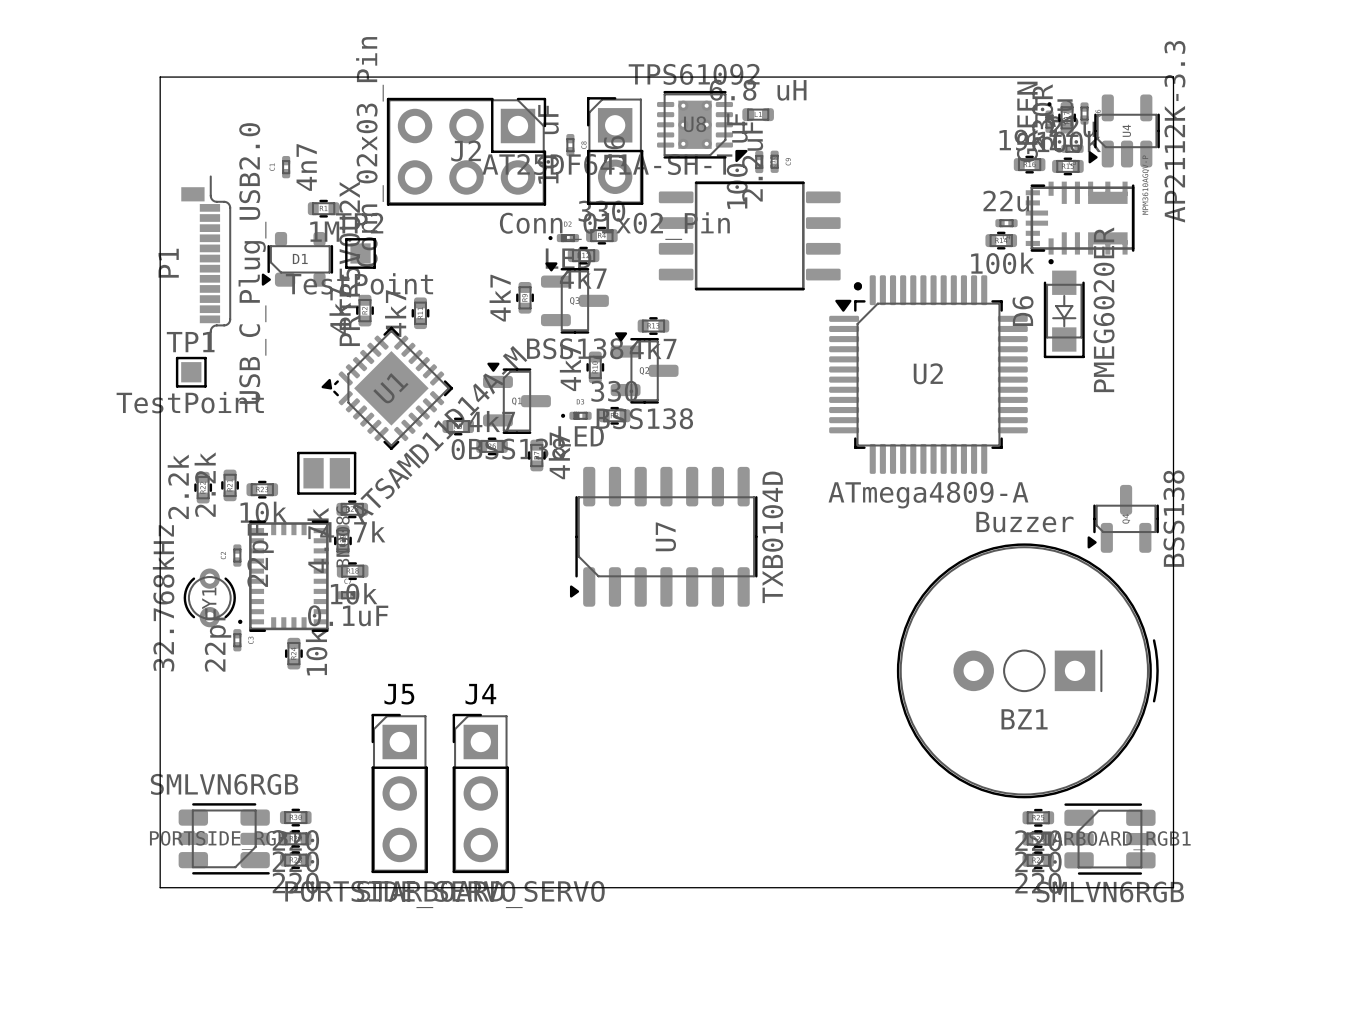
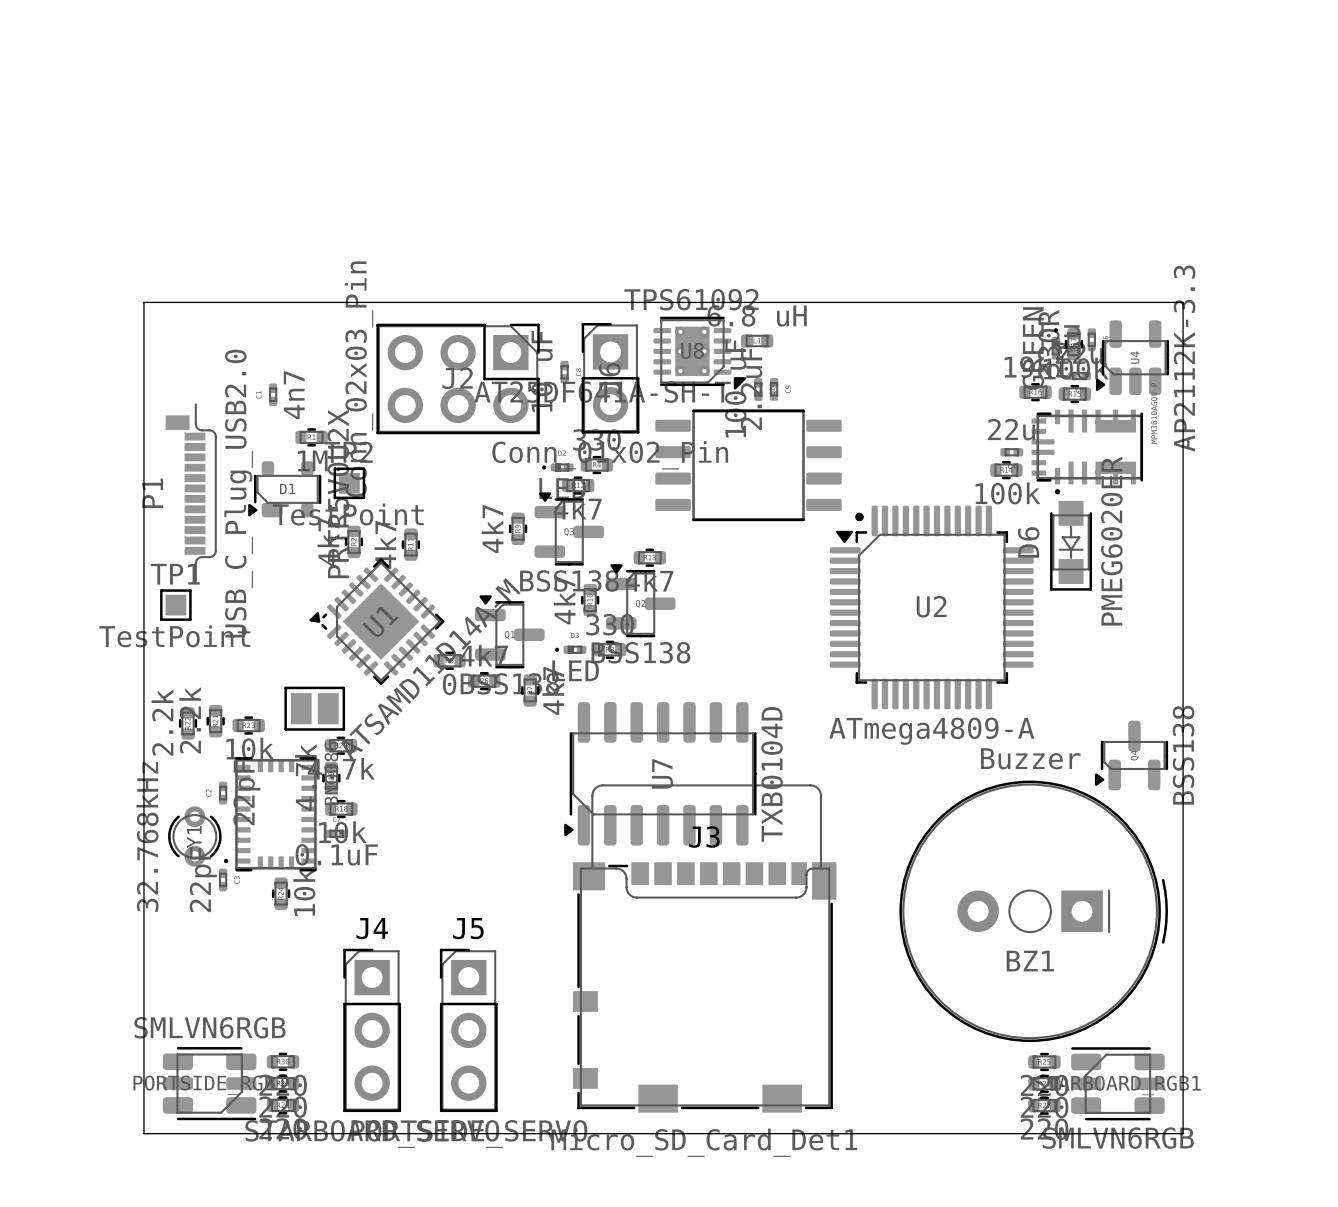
J3: none -> Micro_SD_Card_Det1 (704, 948)
J5 position: (399, 793) -> (468, 1030)
J4 position: (480, 793) -> (372, 1030)

